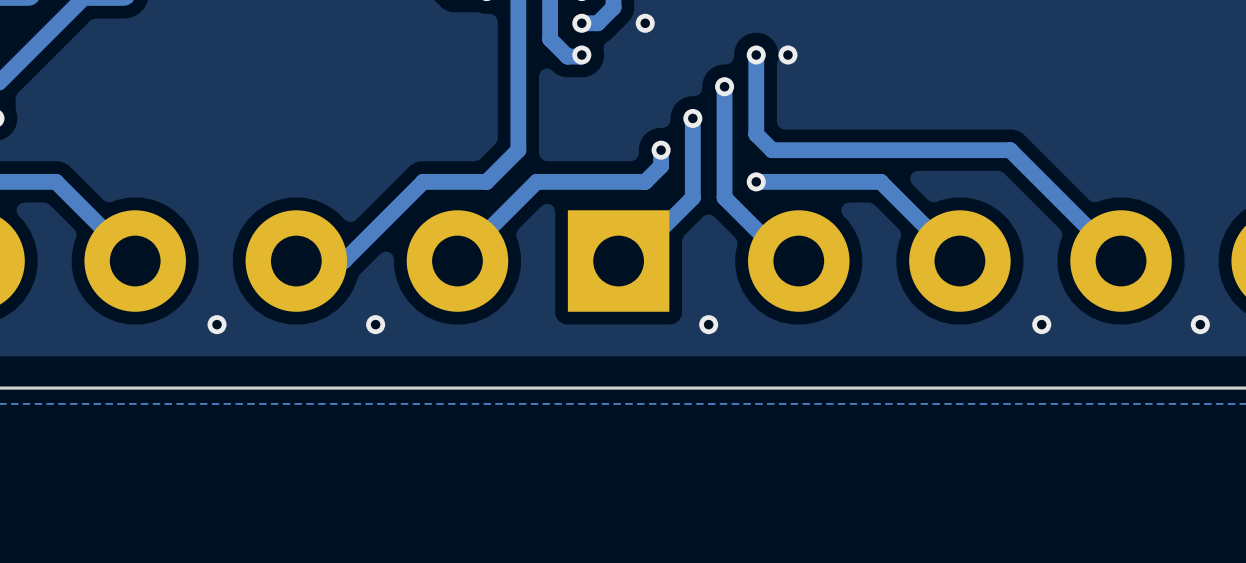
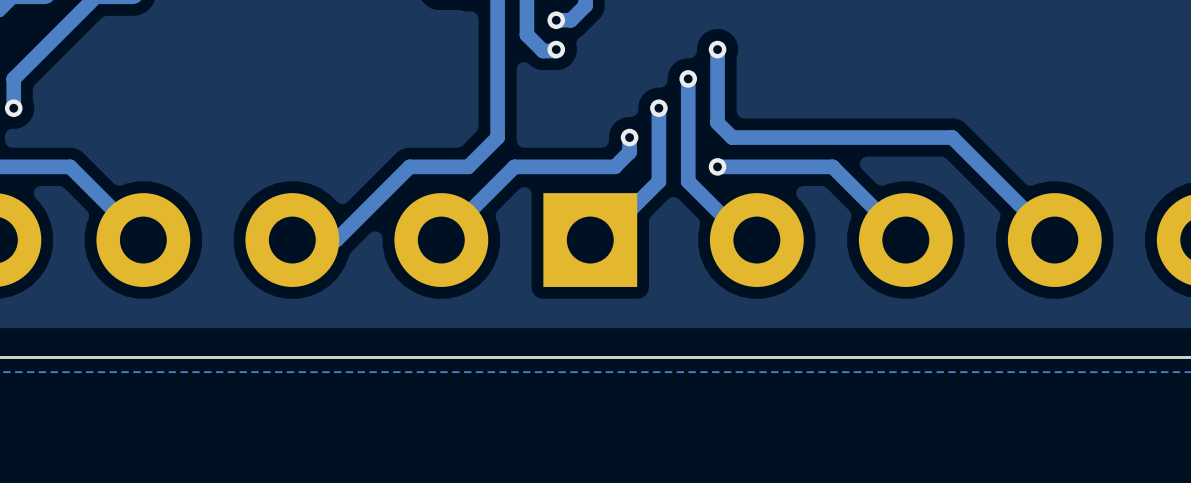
via: (645, 23) -> none
via: (787, 55) -> none
via: (217, 324) -> none
via: (375, 324) -> none
via: (708, 324) -> none
via: (1041, 324) -> none
via: (1200, 324) -> none

